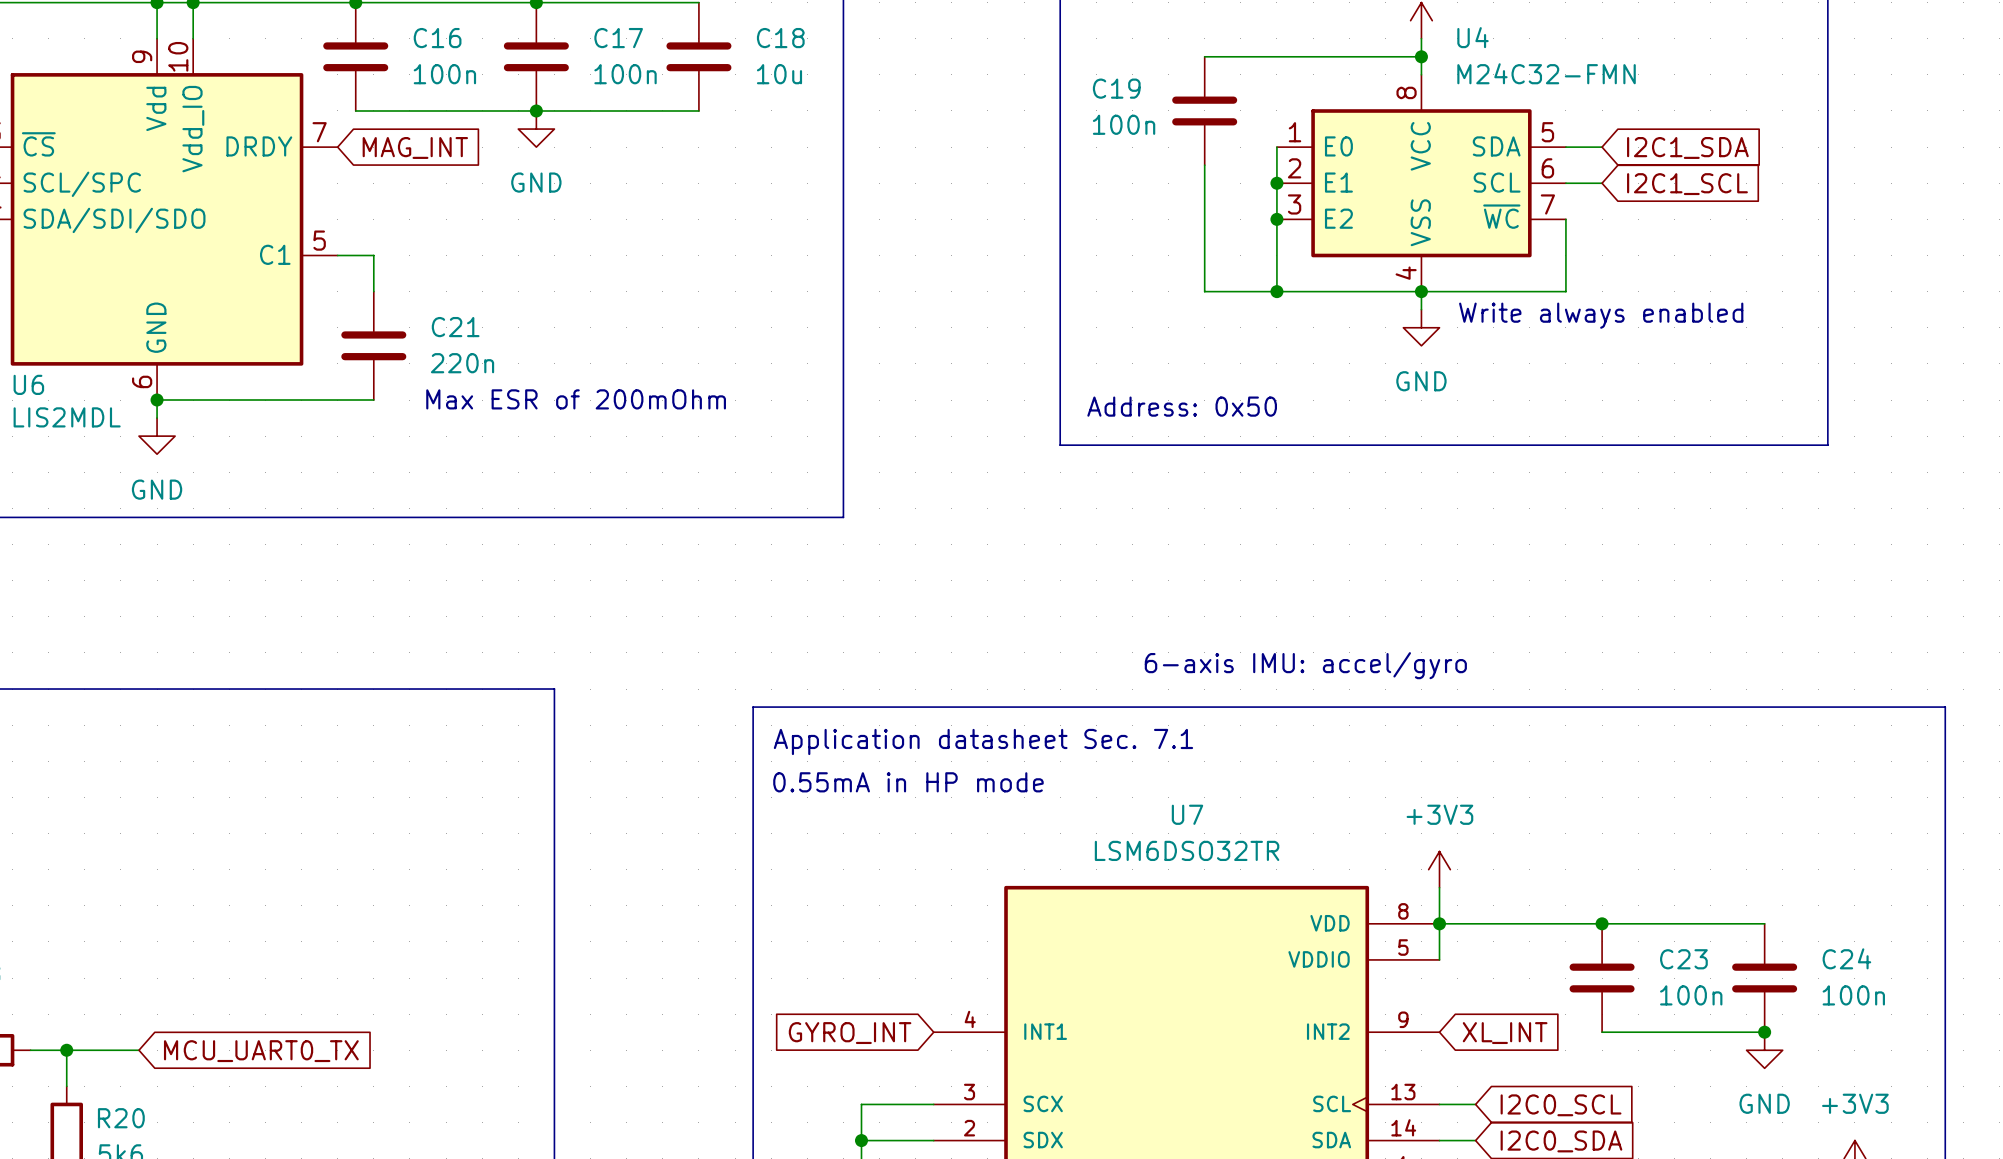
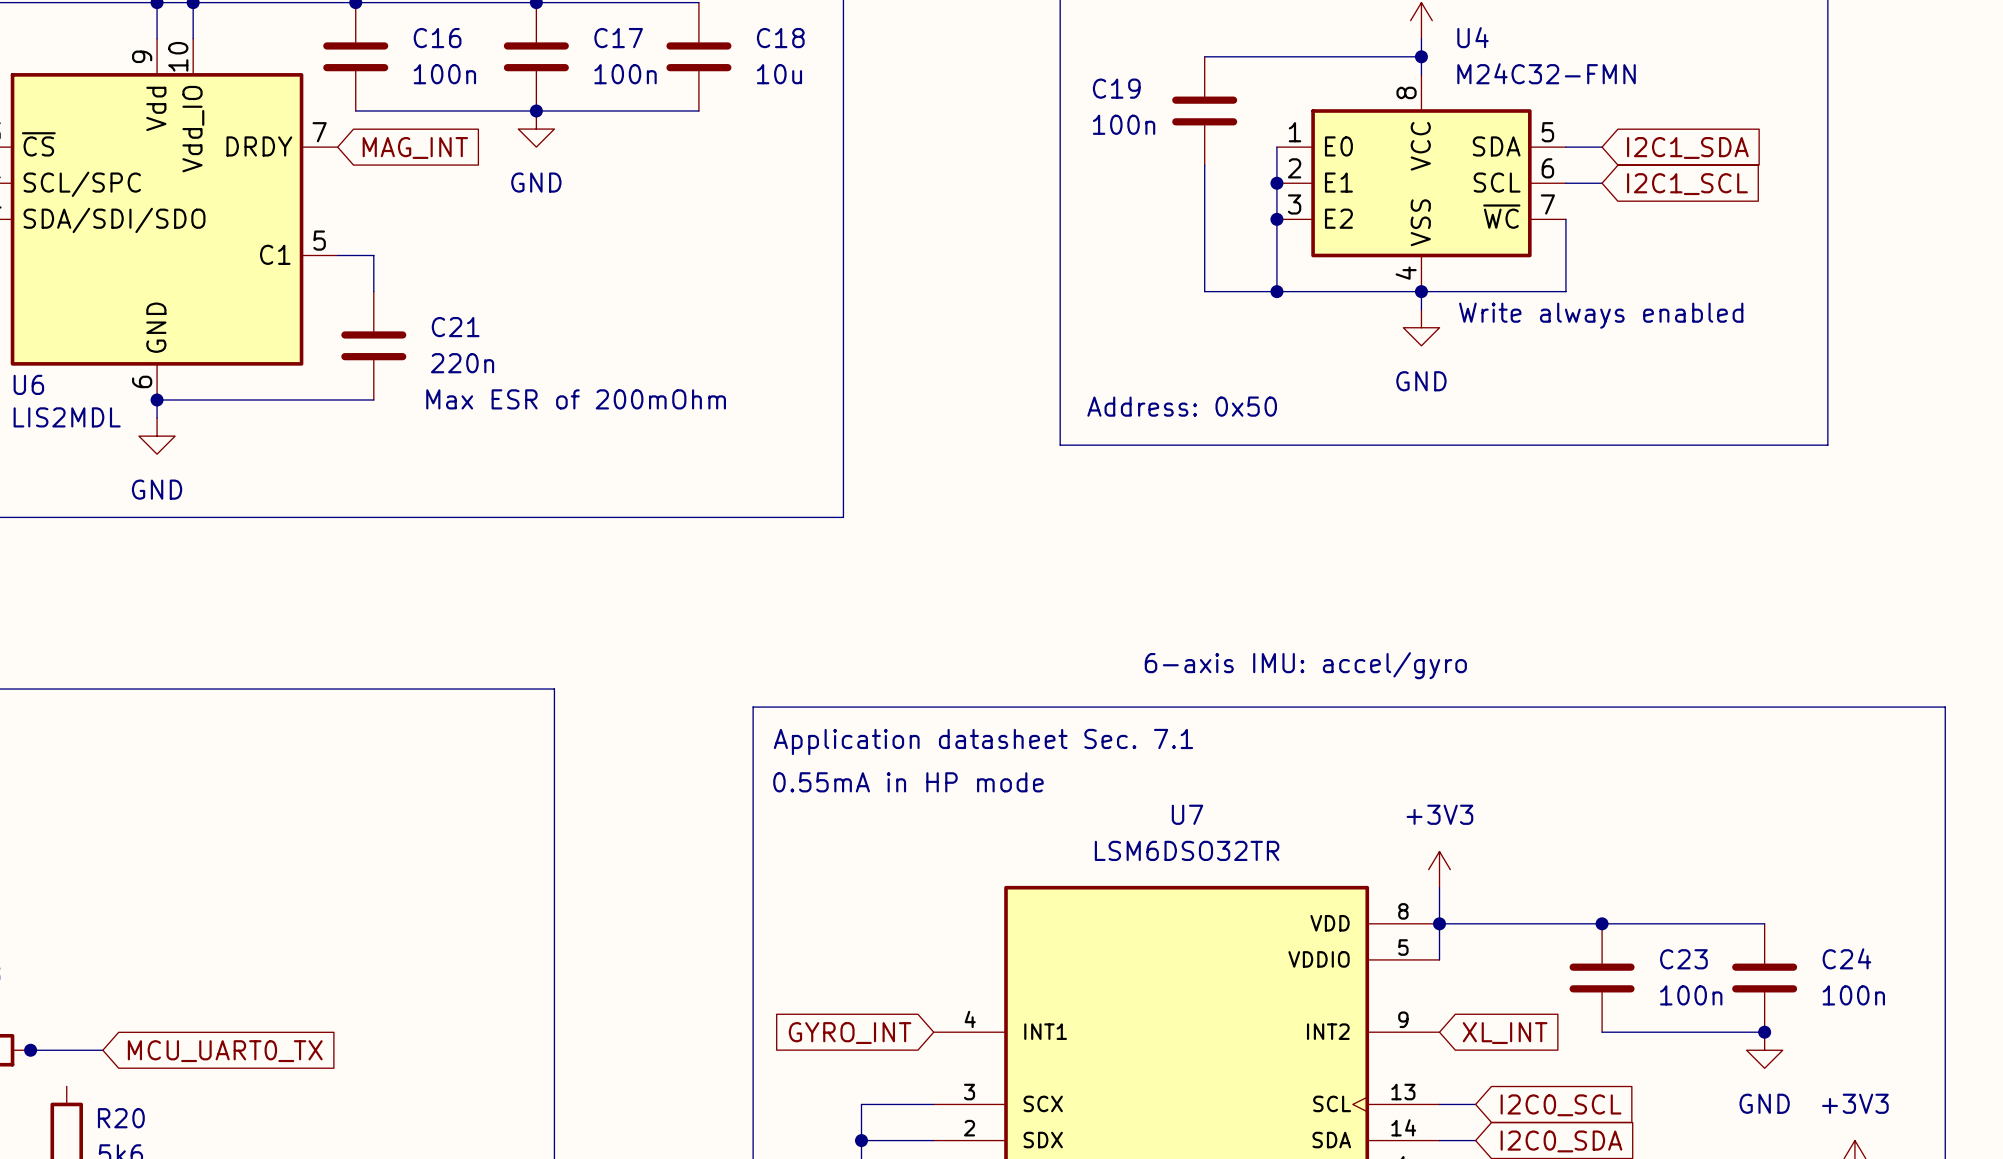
wire: (66, 1050) (66, 1086) -> none
junction position: (66, 1050) -> (30, 1050)
wire: (102, 1050) (138, 1050) -> none
global label position: MCU_UART0_TX (261, 1051) -> MCU_UART0_TX (225, 1051)

